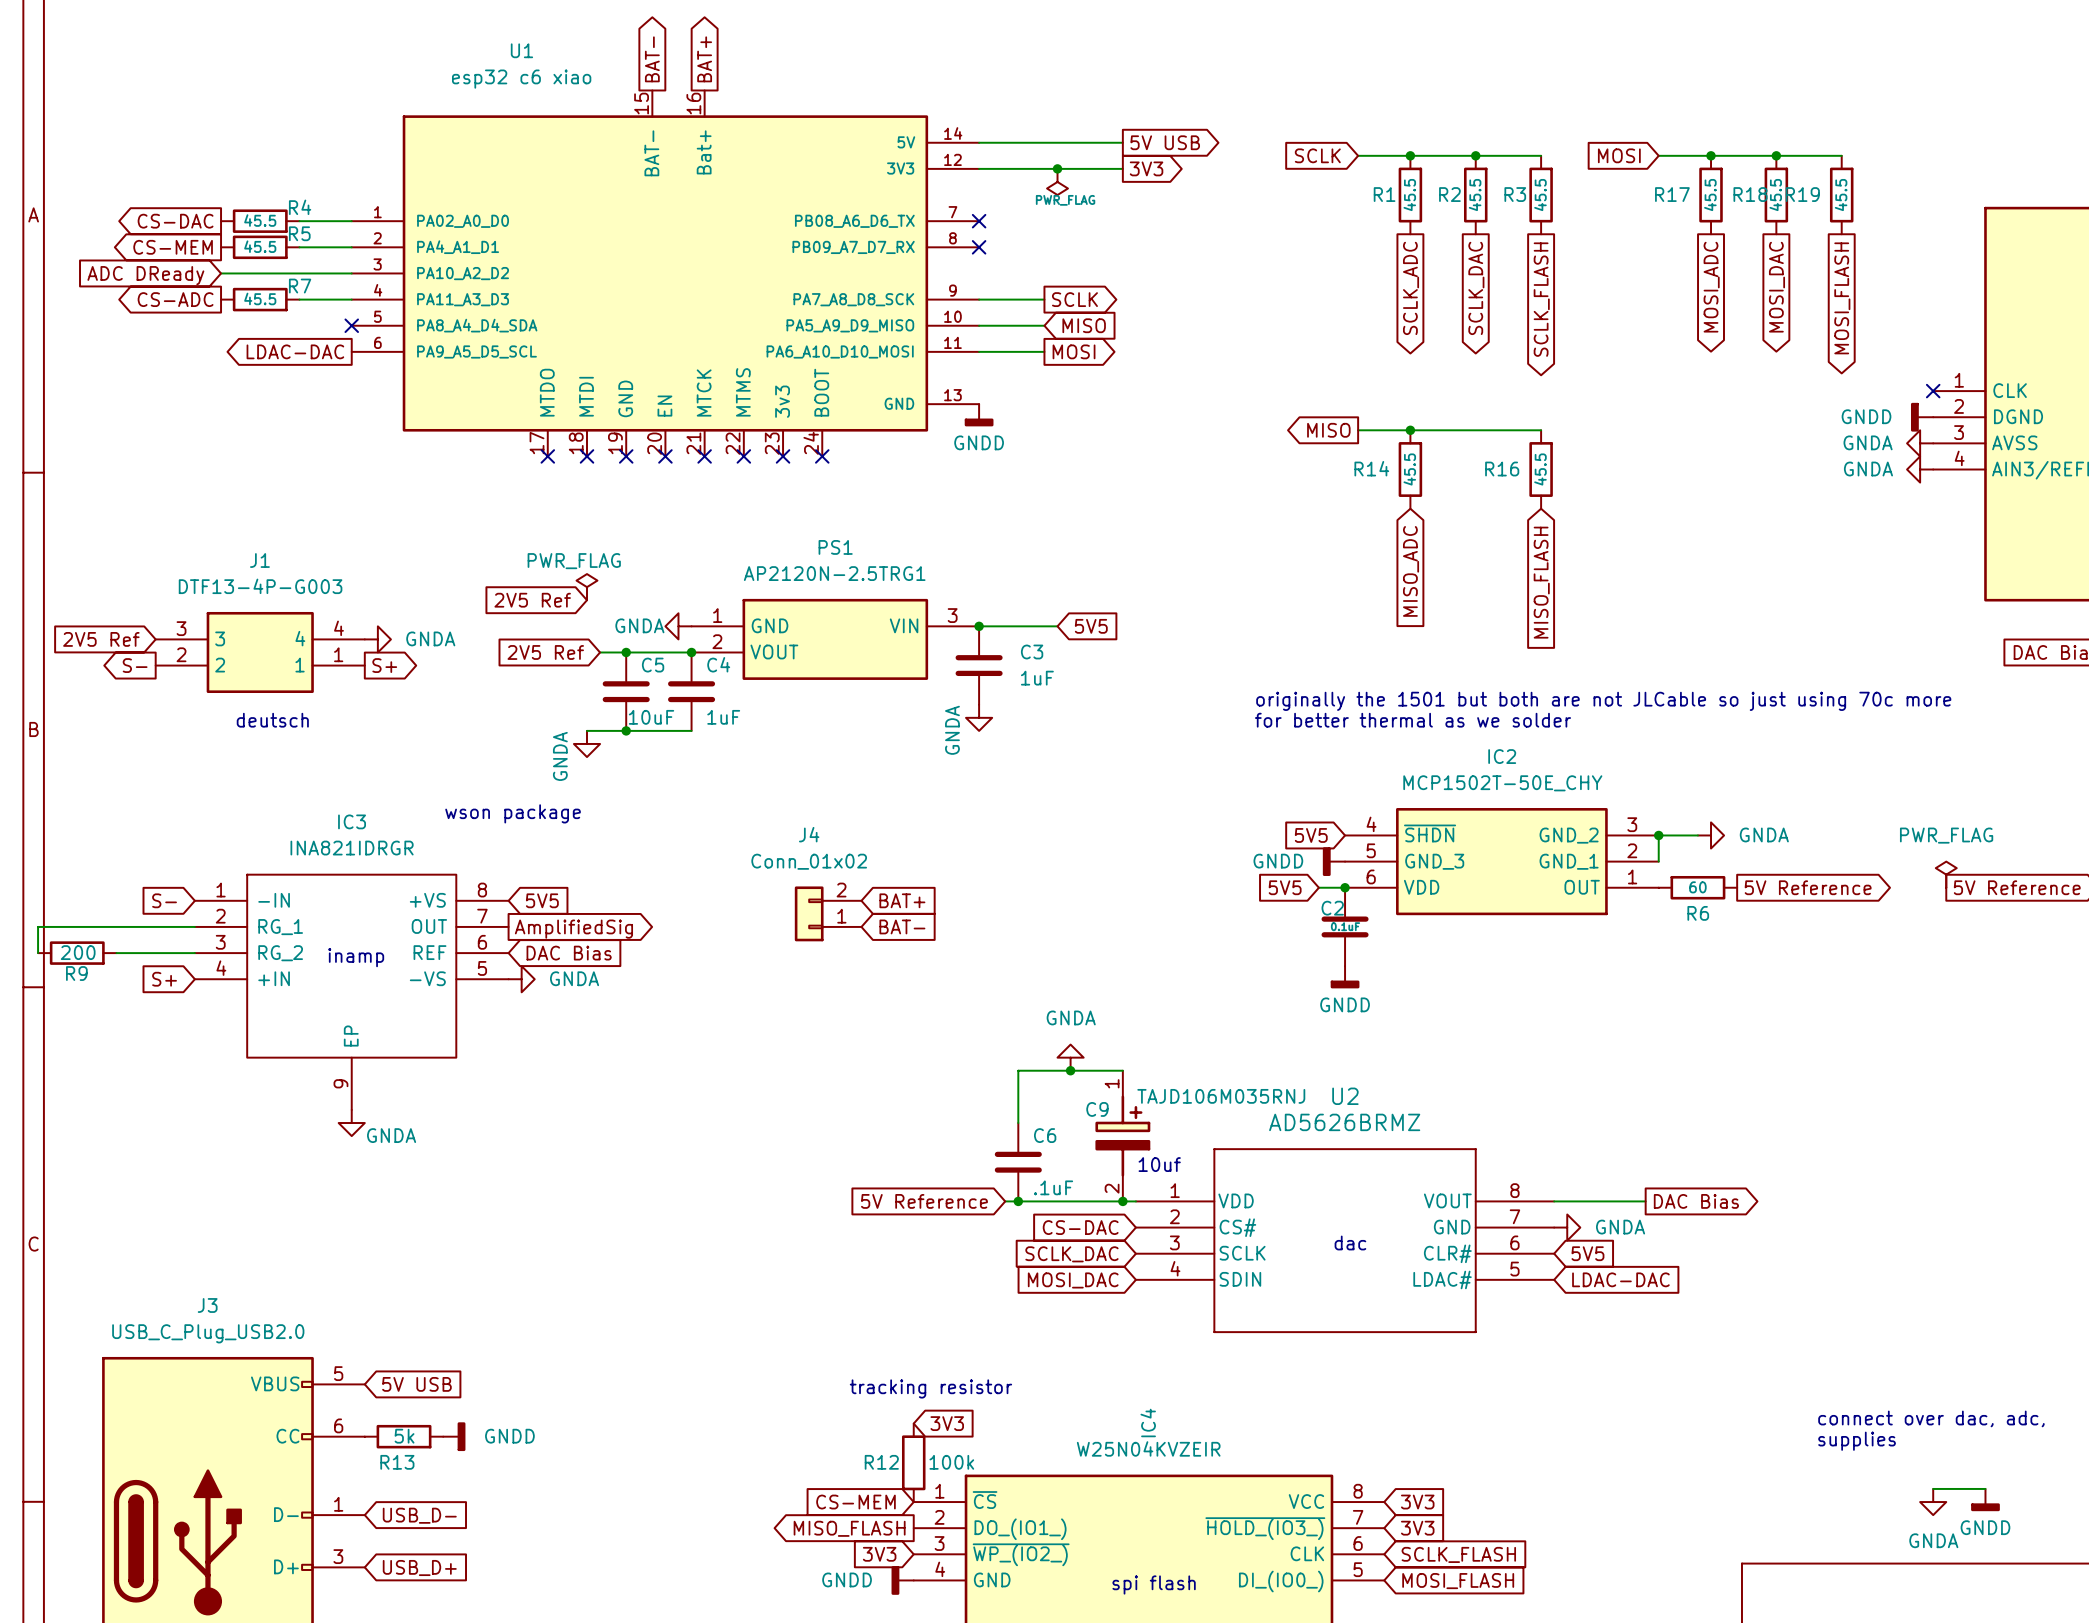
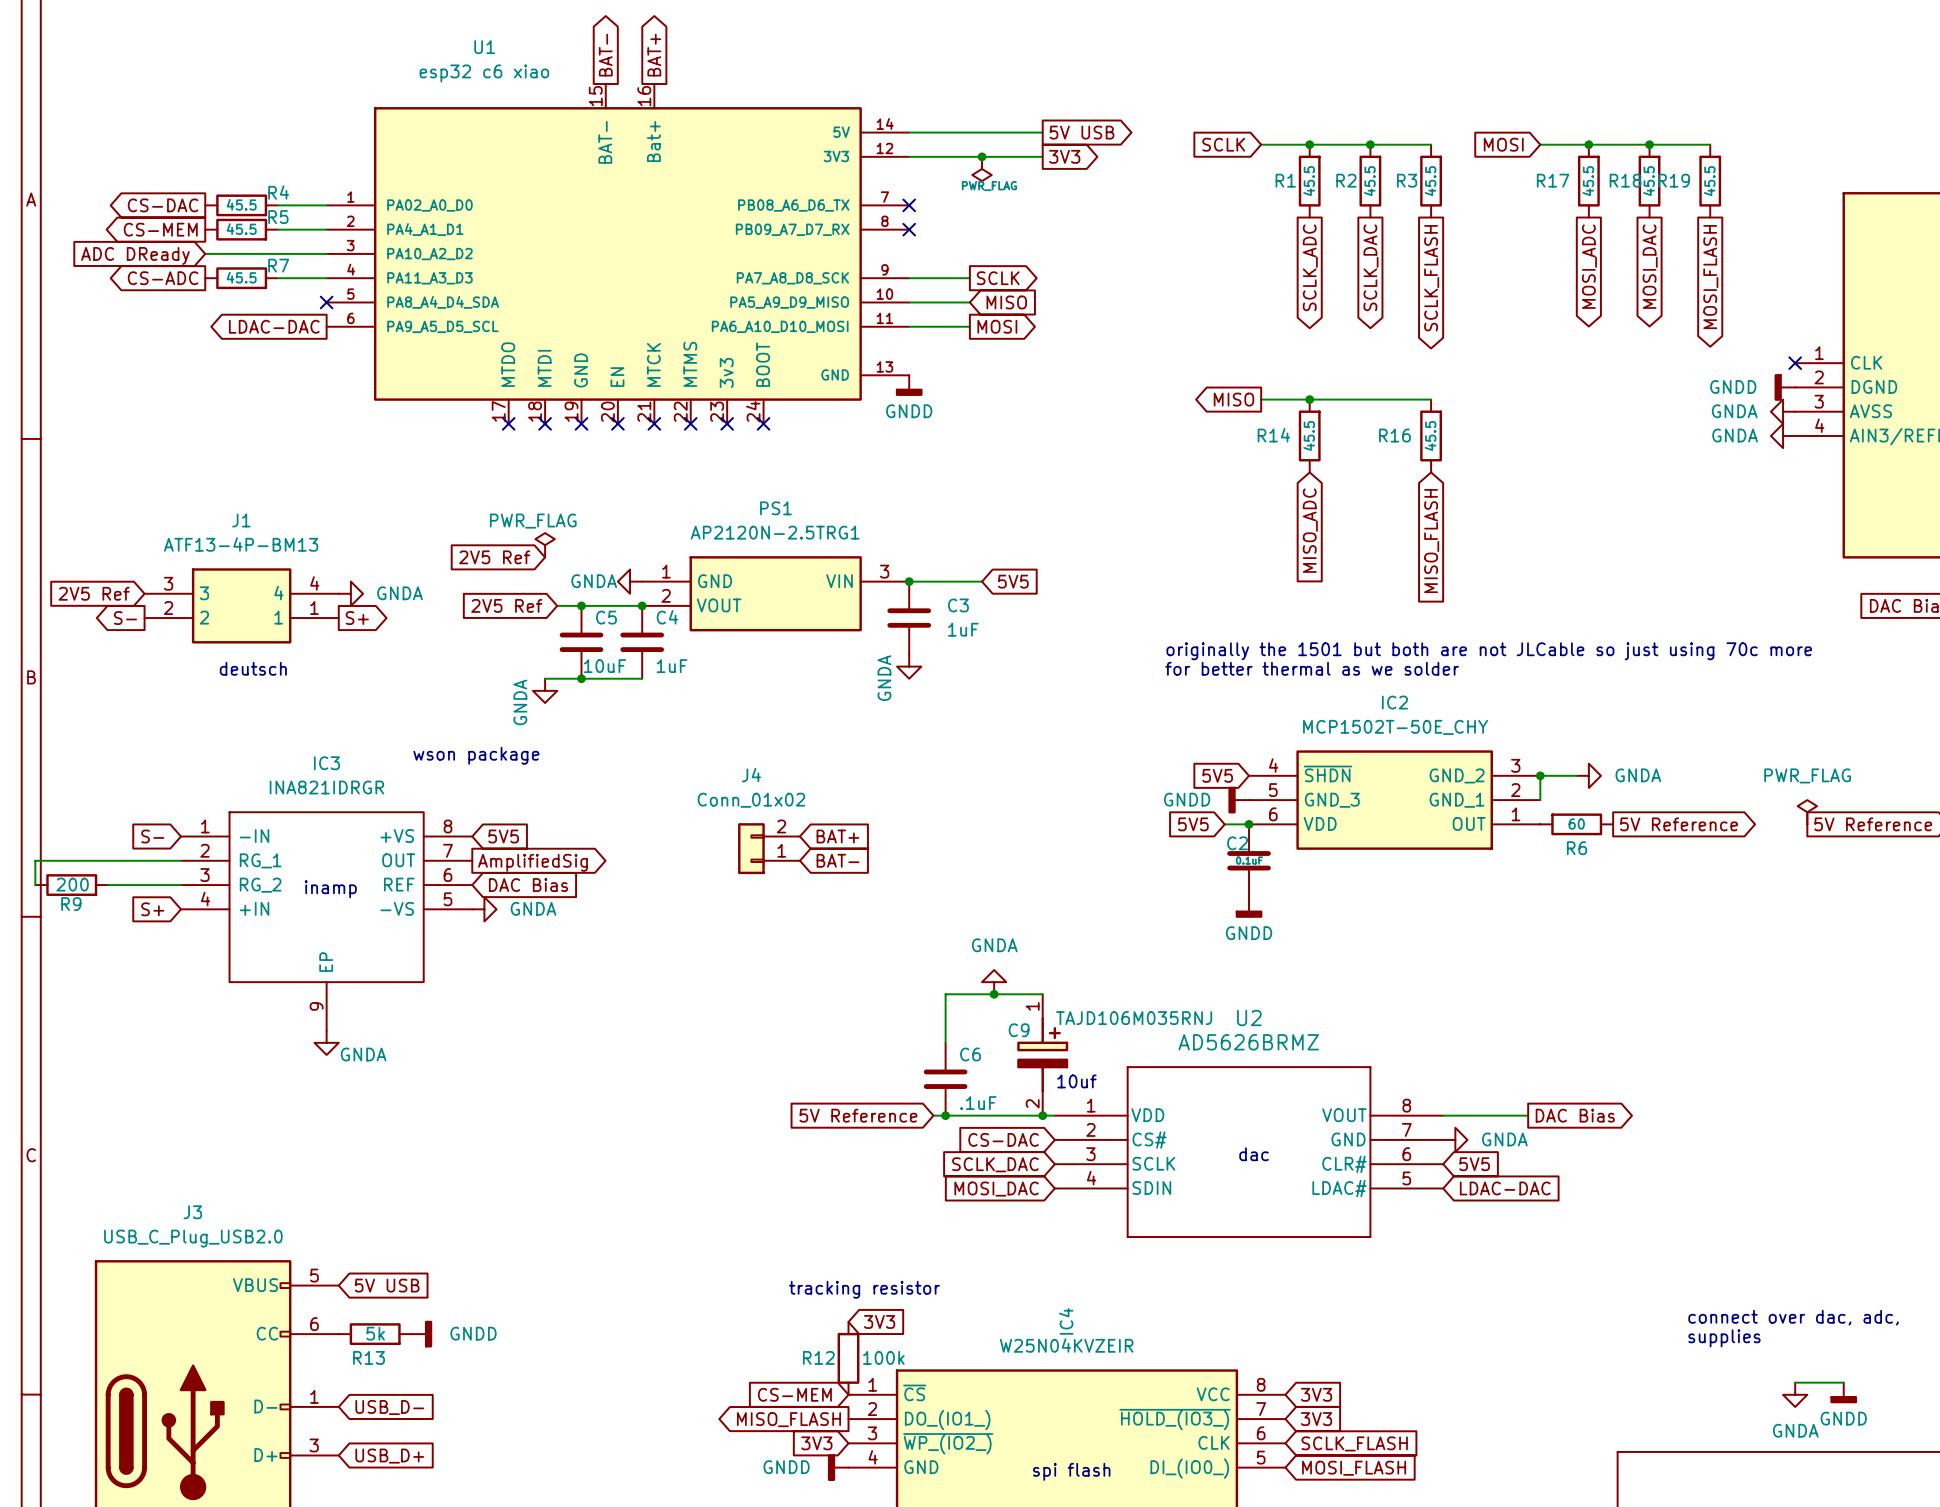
J1 value: DTF13-4P-G003 (260, 586) -> ATF13-4P-BM13 (241, 544)

